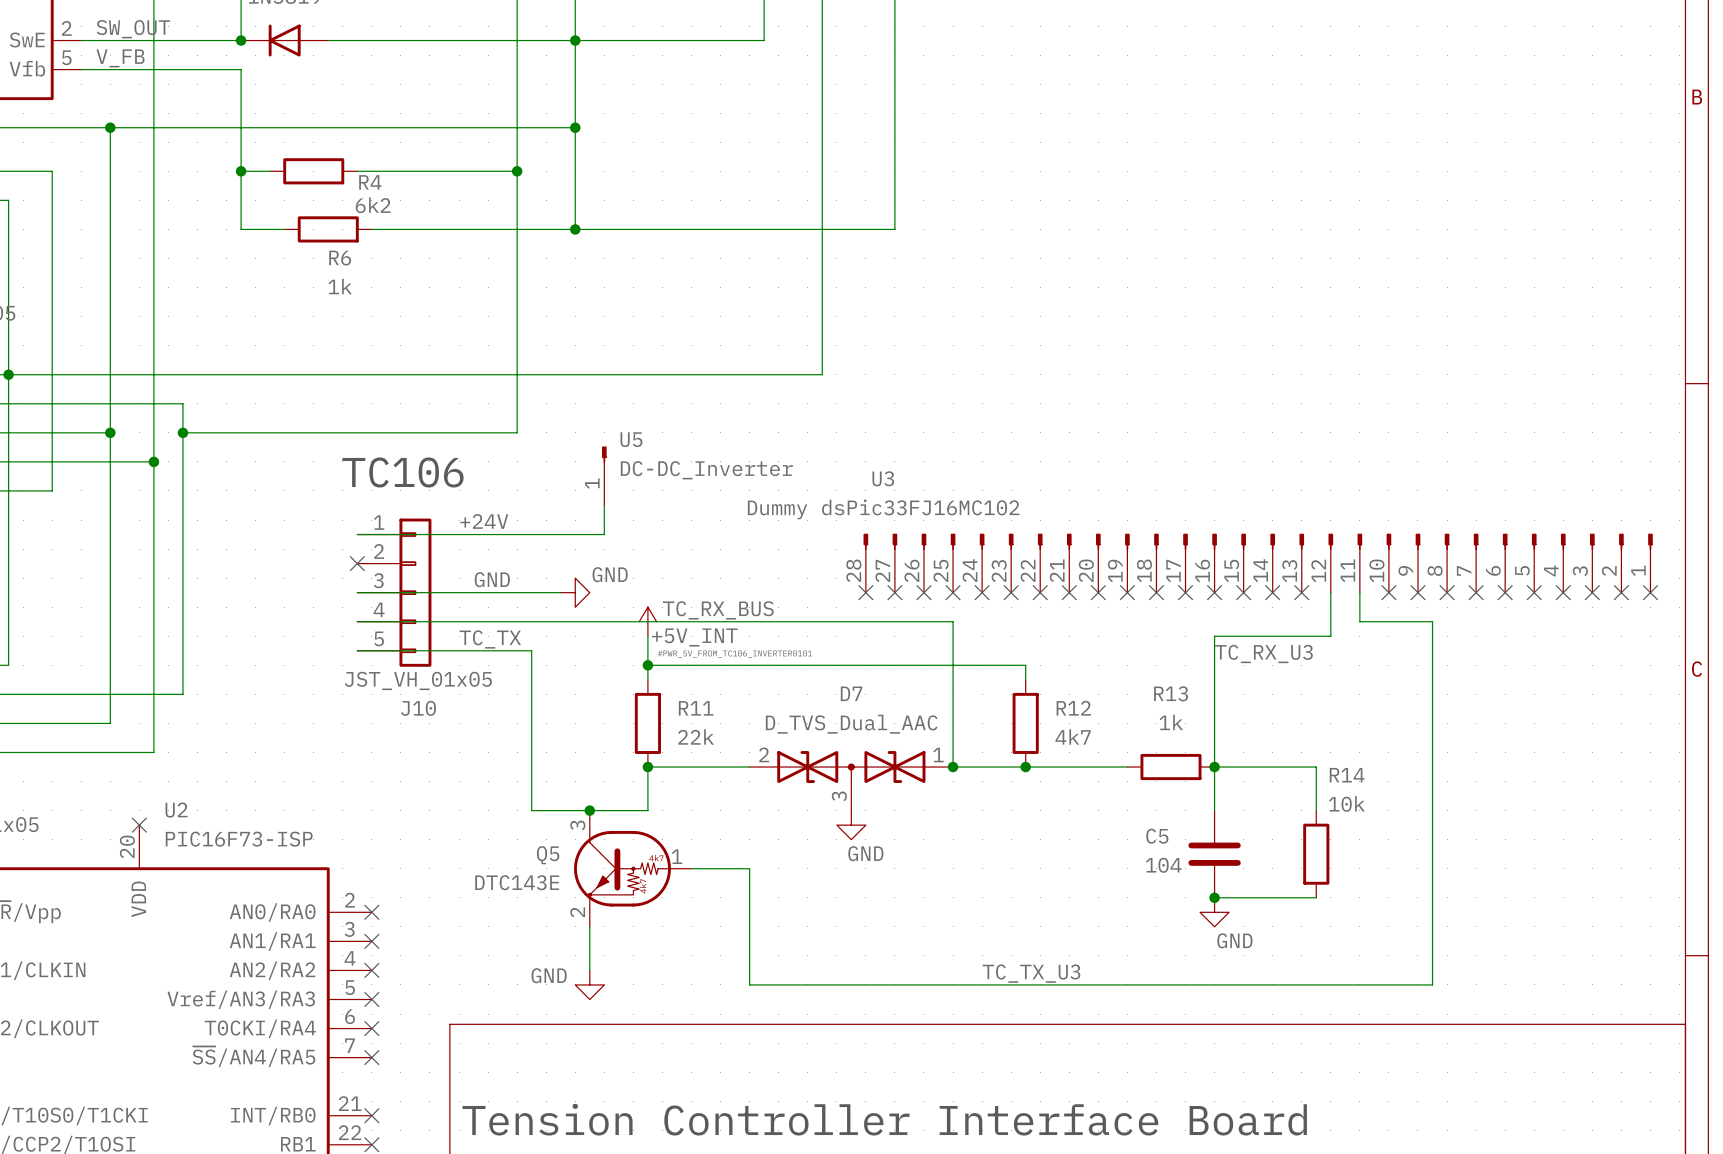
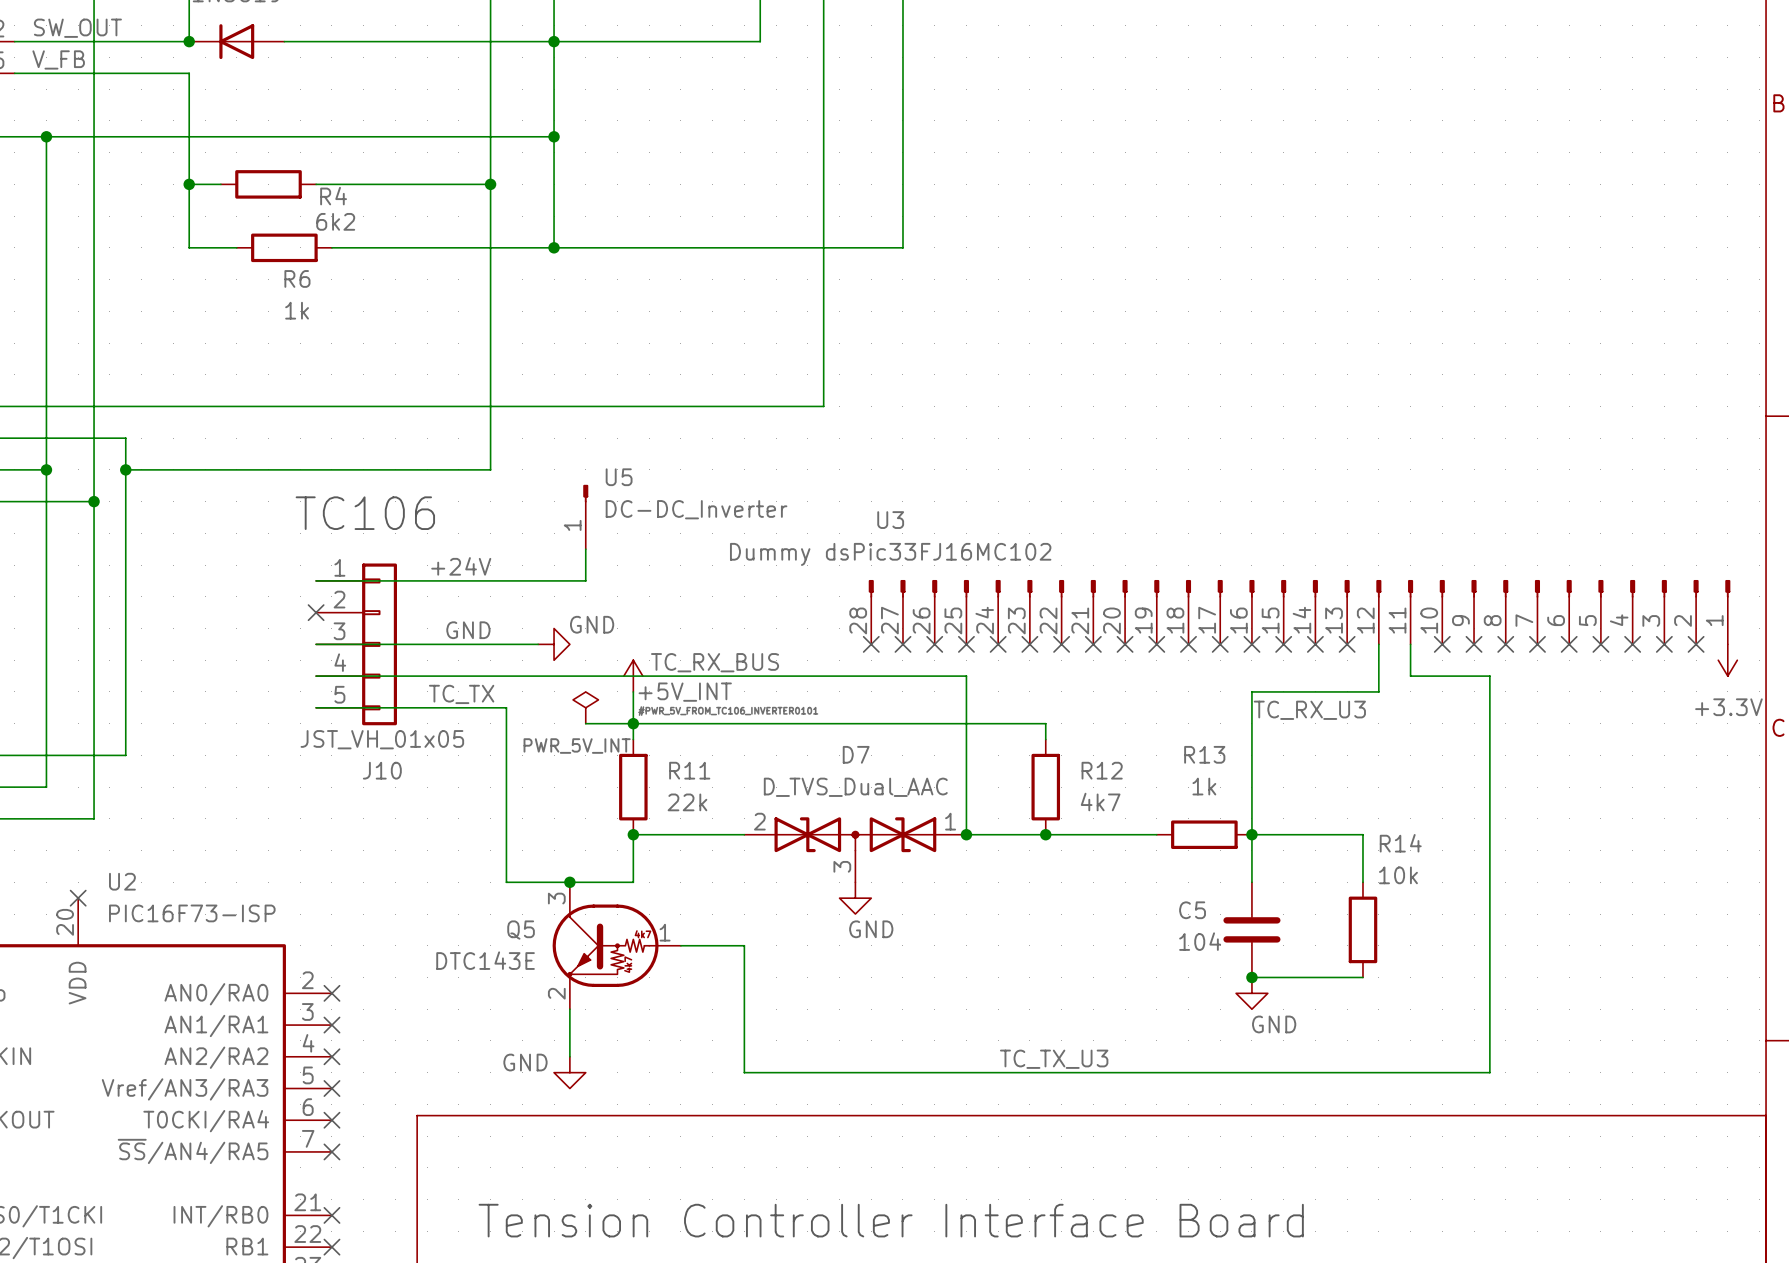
no-connect mark: (1650, 592) -> none
power symbol: none -> +3.3V (1727, 660)
power symbol: none -> PWR_5V_INT (585, 707)
wire: none -> (585, 723) (633, 723)

